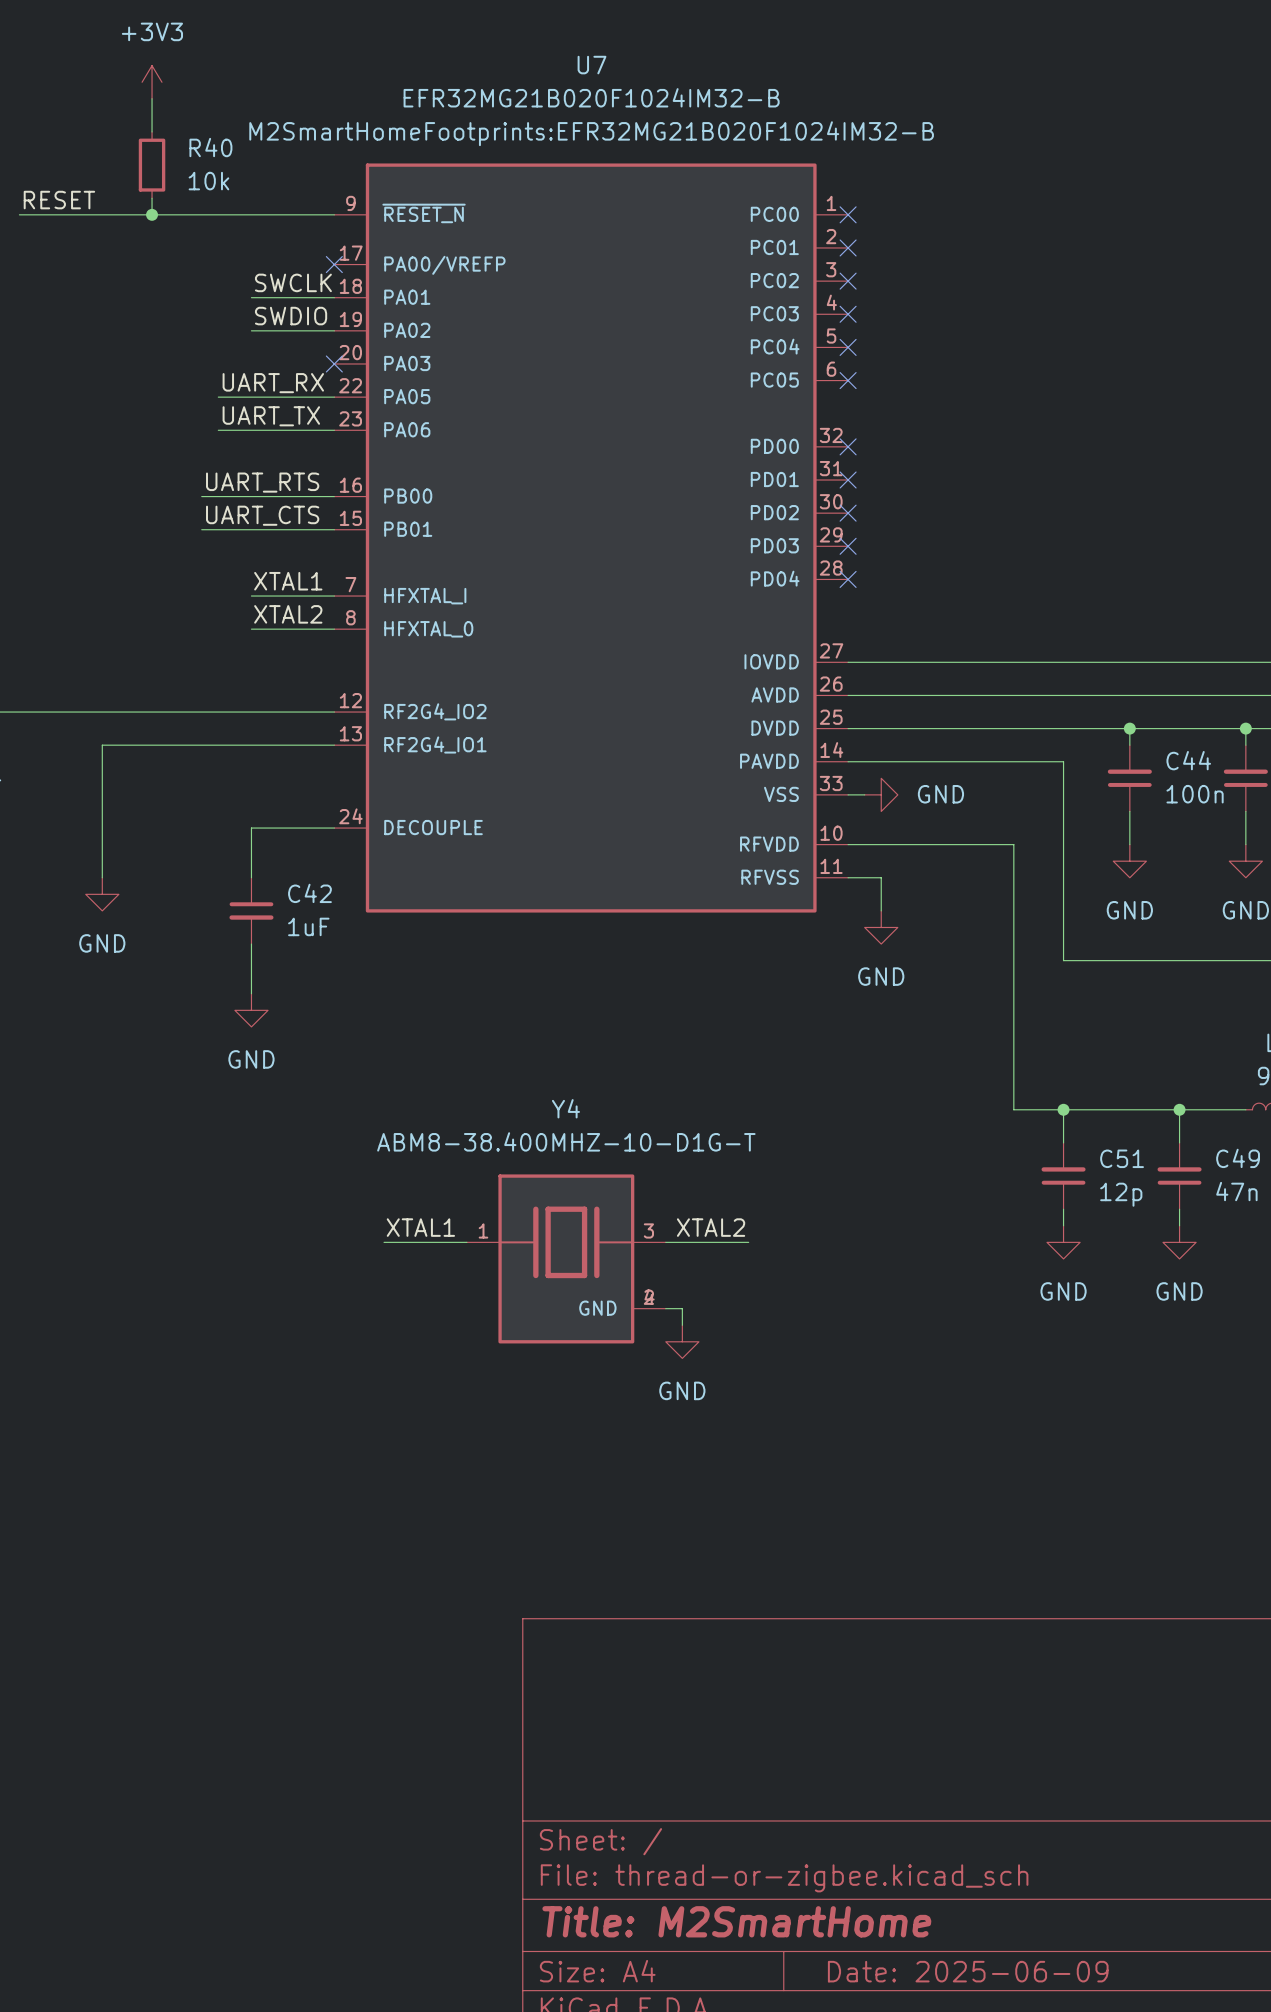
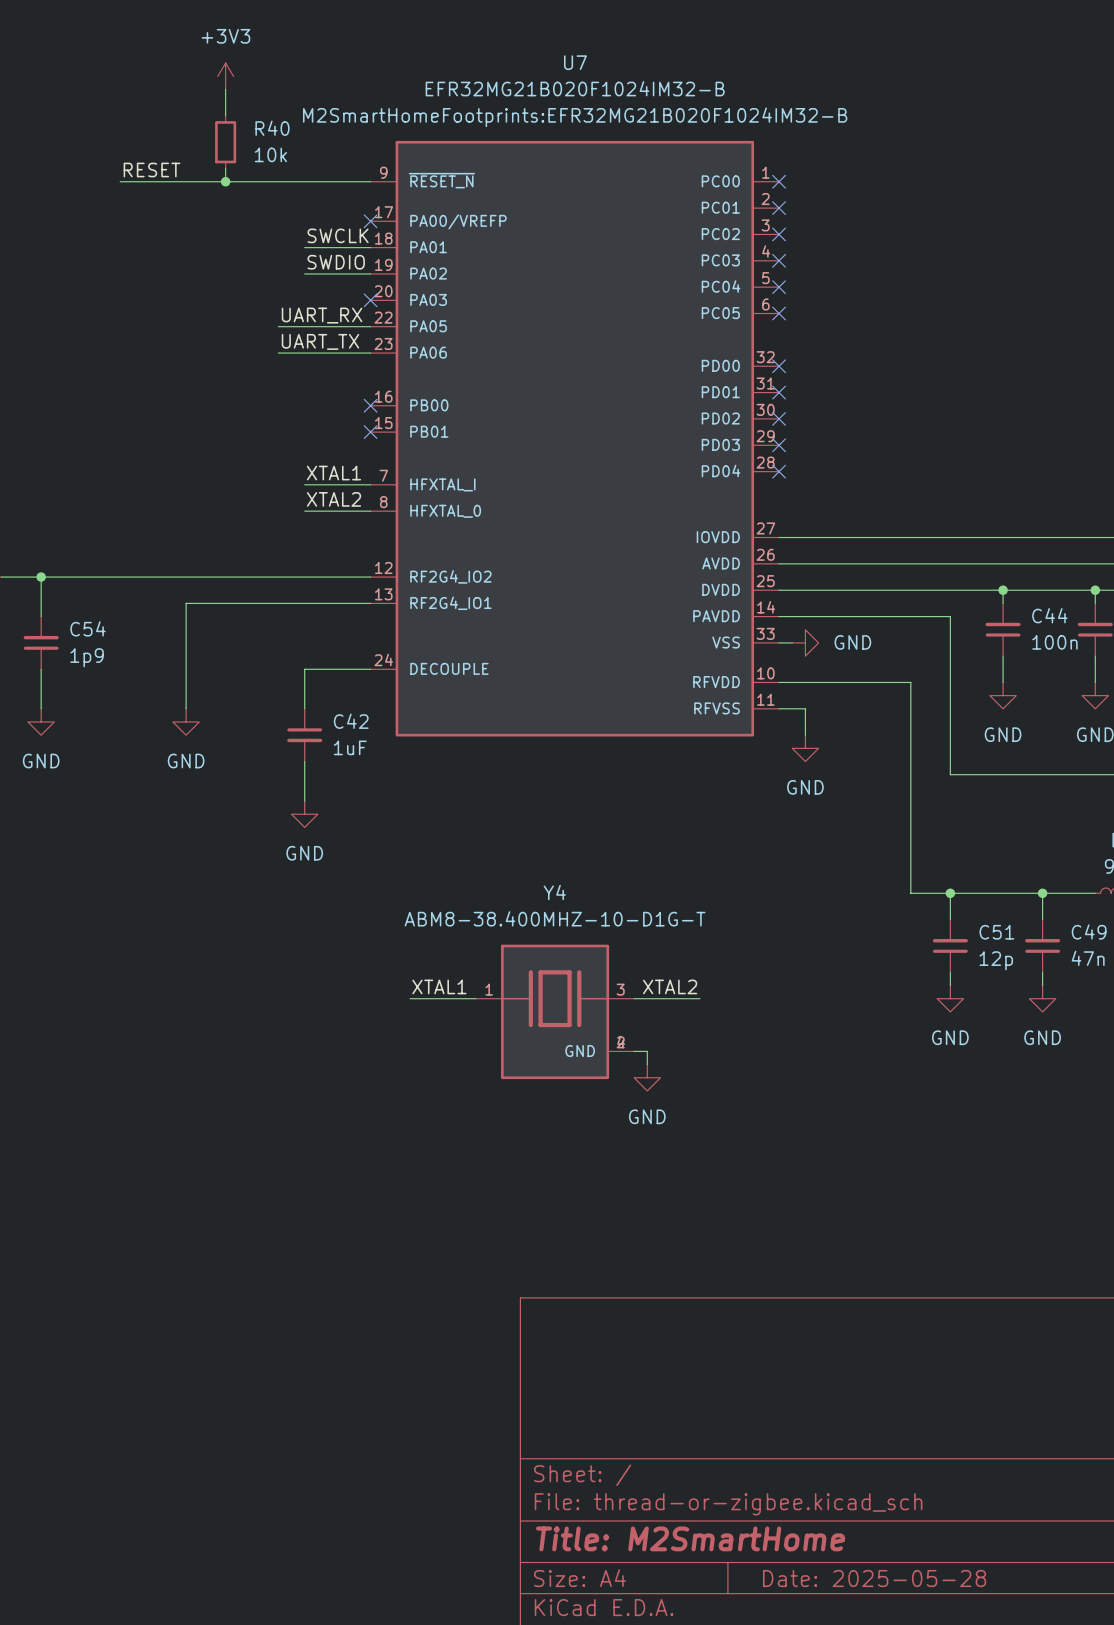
label: UART_RTS (262, 482) -> none
wire: (201, 496) (334, 496) -> none
no-connect mark: none -> (370, 405)
label: UART_CTS (262, 515) -> none
wire: (201, 529) (334, 529) -> none
no-connect mark: none -> (370, 432)
title block: Date: 2025-06-09 (968, 1971) -> Date: 2025-05-28 (874, 1578)

